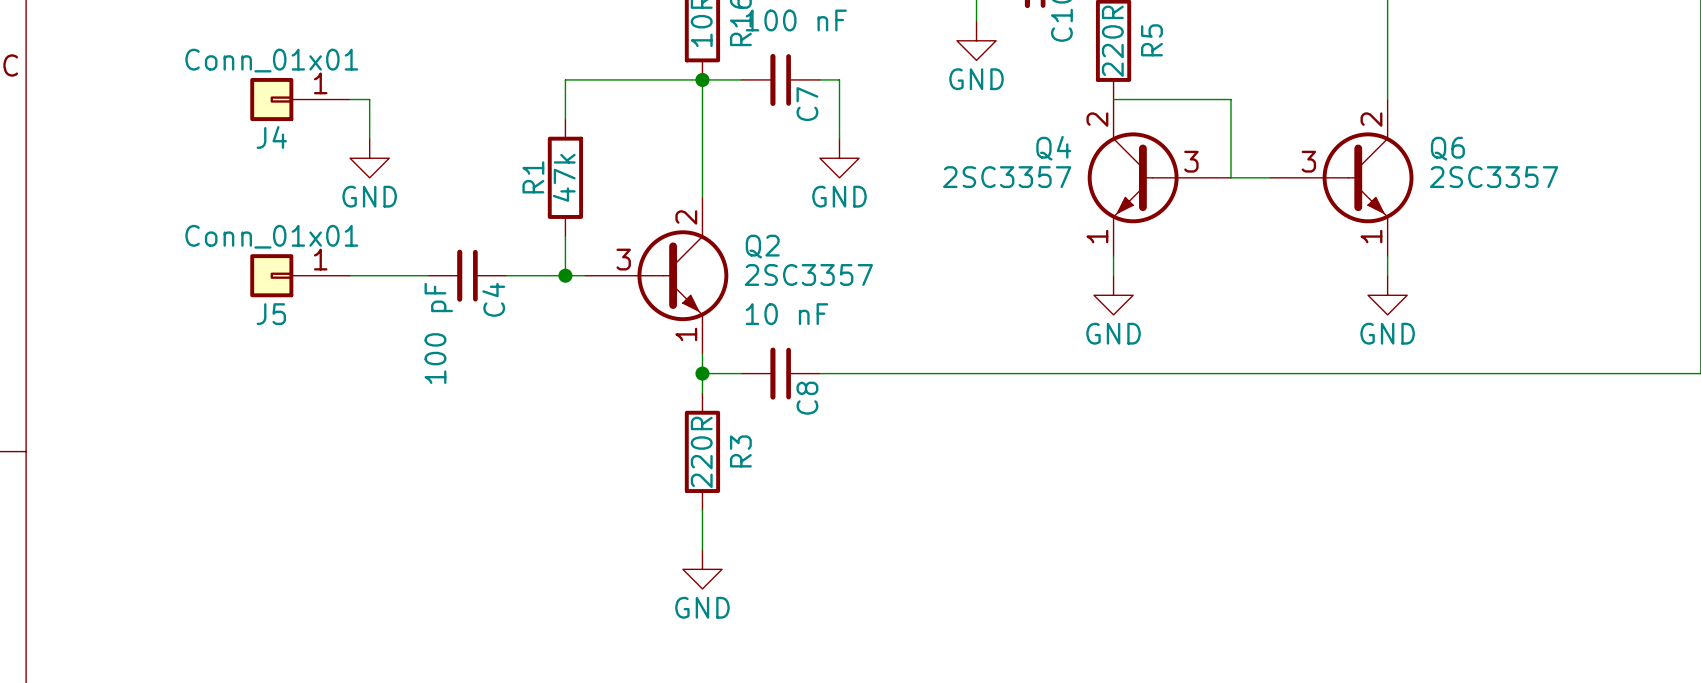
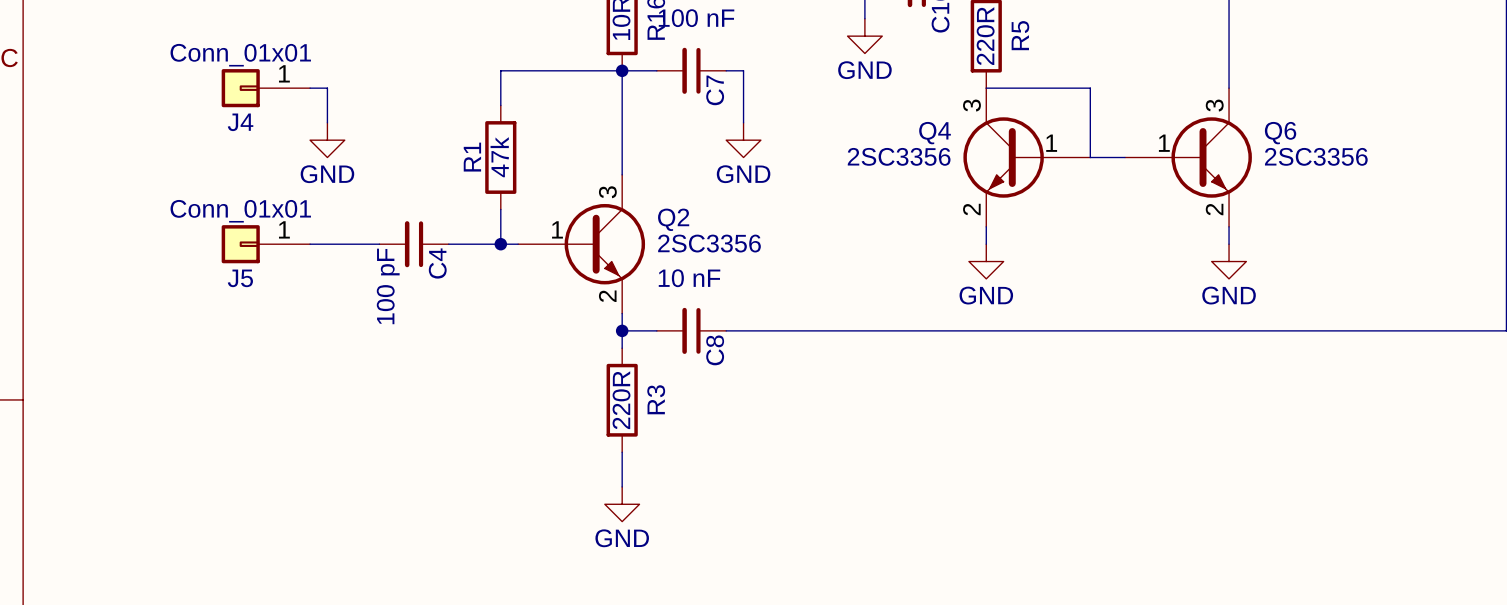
Q4 symbol: [1087, 99, 1232, 257] -> [963, 88, 1091, 227]
Q6 symbol: [1270, 99, 1414, 257] -> [1124, 88, 1252, 227]
Q4 value: 2SC3357 (1007, 177) -> 2SC3356 (899, 156)
Q6 value: 2SC3357 (1494, 177) -> 2SC3356 (1316, 156)
Q2 symbol: [585, 197, 729, 355] -> [518, 174, 646, 314]
Q2 value: 2SC3357 (808, 274) -> 2SC3356 (709, 243)

